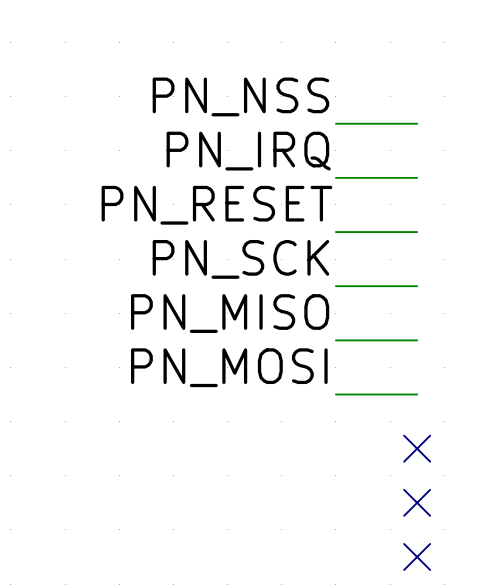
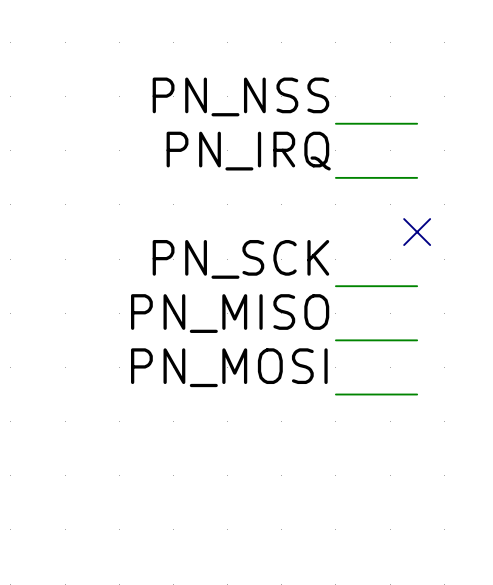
label: PN_RESET (216, 205) -> none
wire: (335, 232) (417, 232) -> none
no-connect mark: none -> (417, 232)
no-connect mark: (417, 448) -> none
no-connect mark: (417, 502) -> none
no-connect mark: (417, 556) -> none

